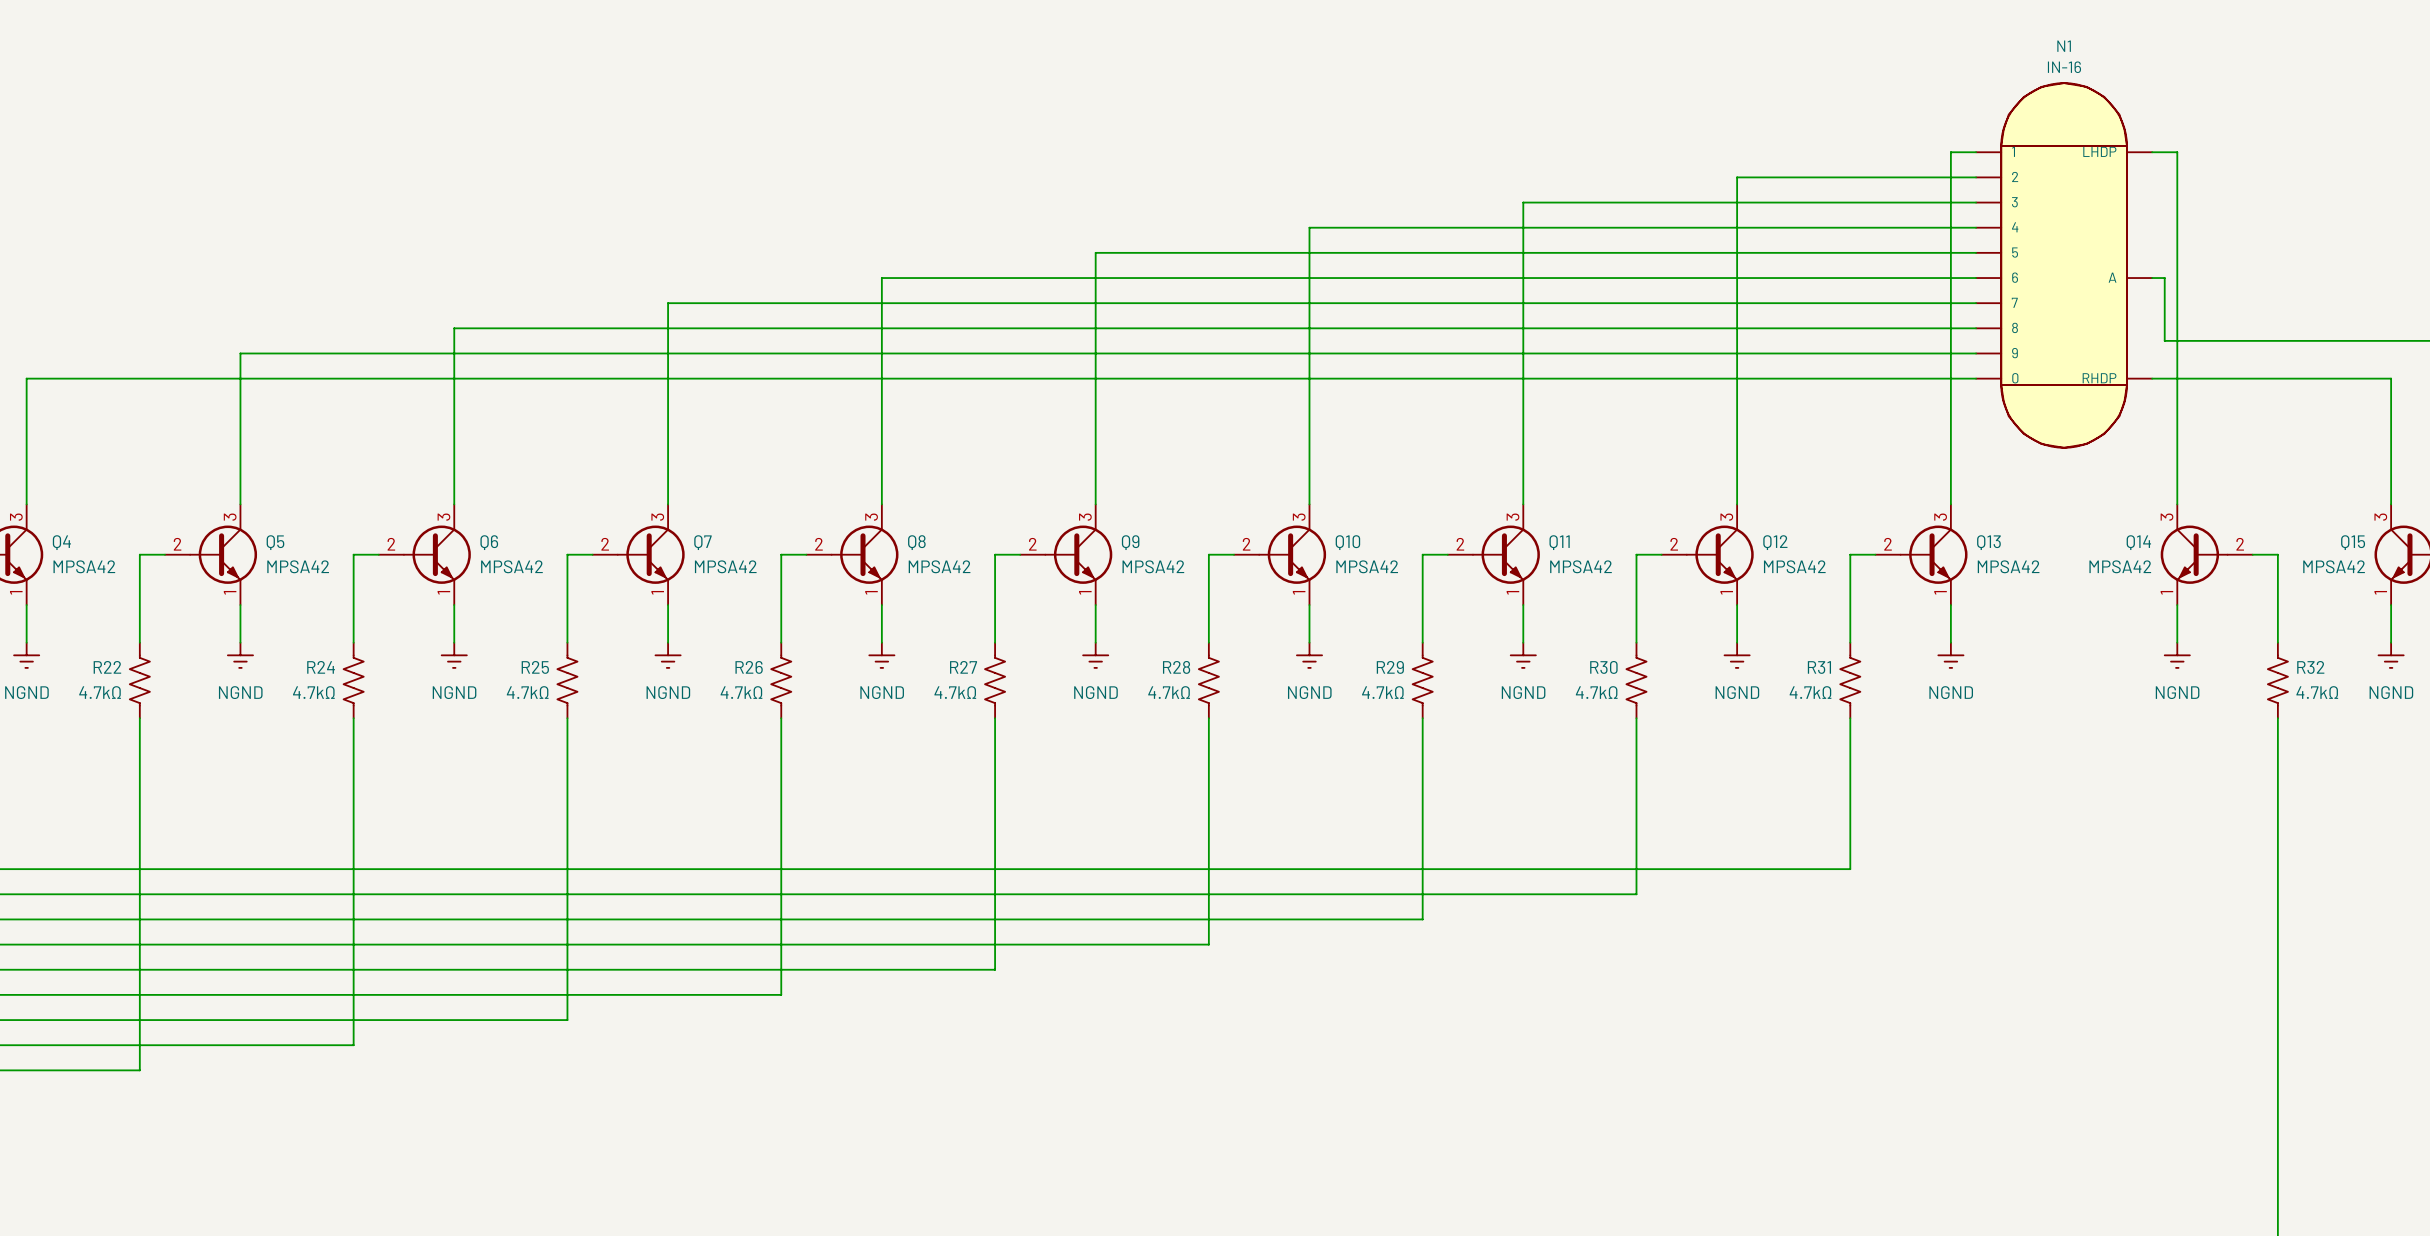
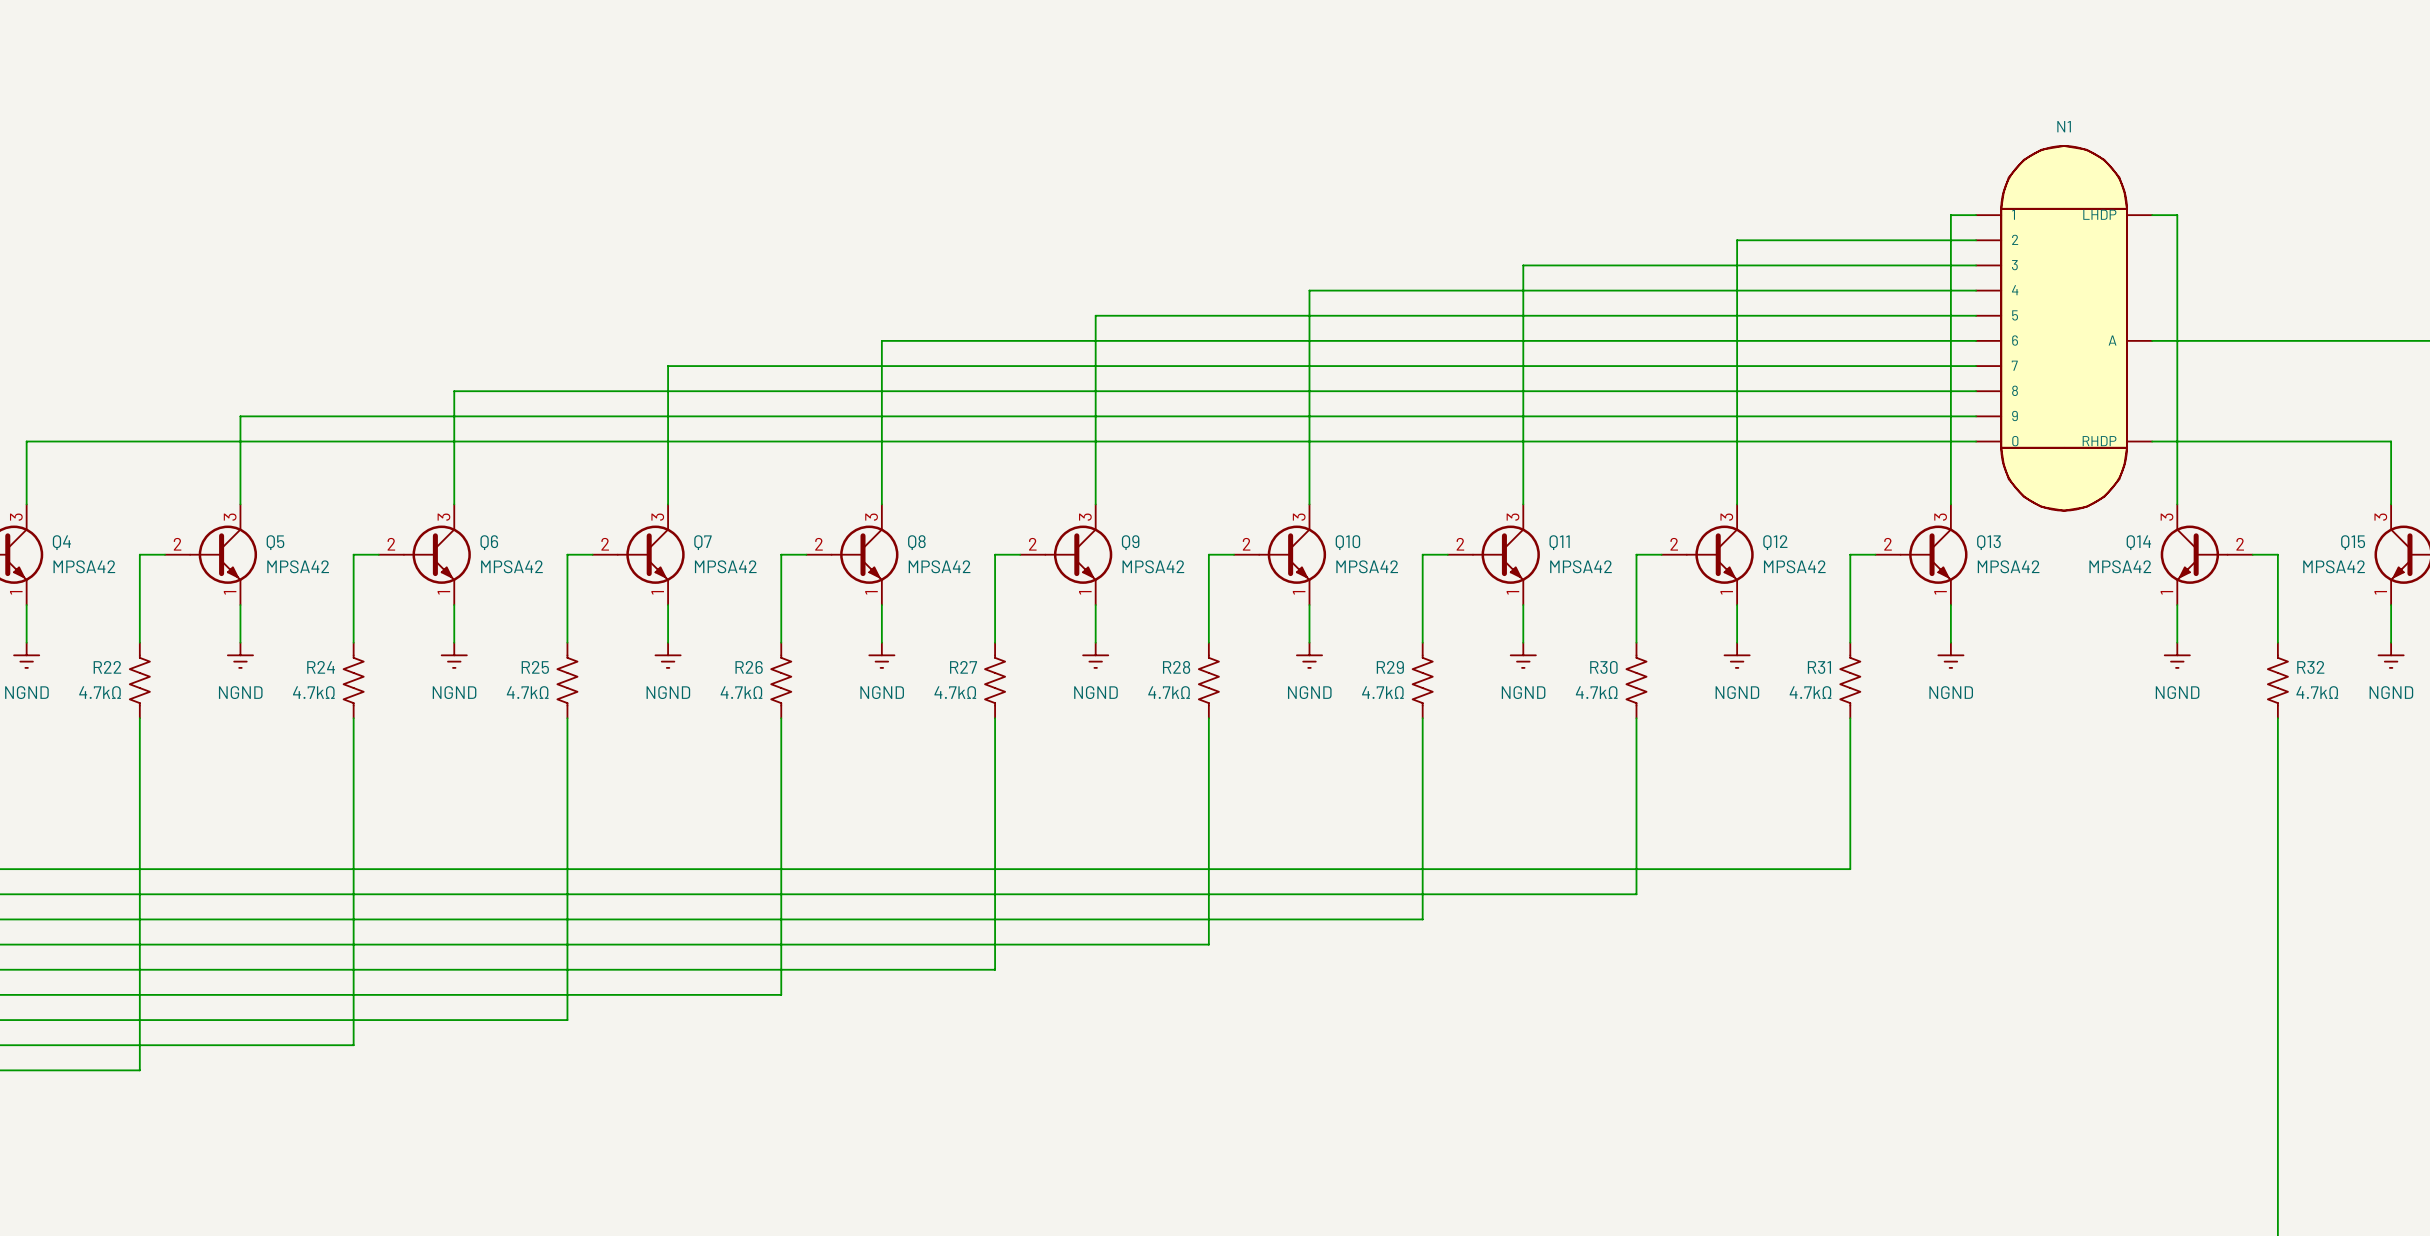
N1 name position: N1 (2064, 46) -> N1 (2064, 126)
N1 value: IN-16 (2064, 67) -> none
wire: (1976, 152) (1950, 152) (1950, 215) -> (1976, 215) (1950, 215)
wire: (2152, 152) (2177, 152) (2177, 215) -> (2152, 215) (2177, 215)
wire: (1976, 177) (1737, 177) (1737, 240) -> (1976, 240) (1737, 240)
wire: (1976, 202) (1523, 202) (1523, 265) -> (1976, 265) (1523, 265)
wire: (1976, 227) (1309, 227) (1309, 290) -> (1976, 290) (1309, 290)
wire: (1976, 252) (1095, 252) (1095, 315) -> (1976, 315) (1095, 315)
N1 position: (2064, 265) -> (2064, 328)
wire: (1976, 278) (881, 278) (881, 340) -> (1976, 340) (881, 340)
wire: (2152, 278) (2164, 278) (2164, 340) -> (2152, 340) (2164, 340)
wire: (1976, 303) (668, 303) (668, 366) -> (1976, 366) (668, 366)
wire: (1976, 328) (454, 328) (454, 391) -> (1976, 391) (454, 391)
wire: (1976, 353) (240, 353) (240, 416) -> (1976, 416) (240, 416)
wire: (1976, 378) (26, 378) (26, 441) -> (1976, 441) (26, 441)
wire: (2152, 378) (2391, 378) (2391, 441) -> (2152, 441) (2391, 441)

